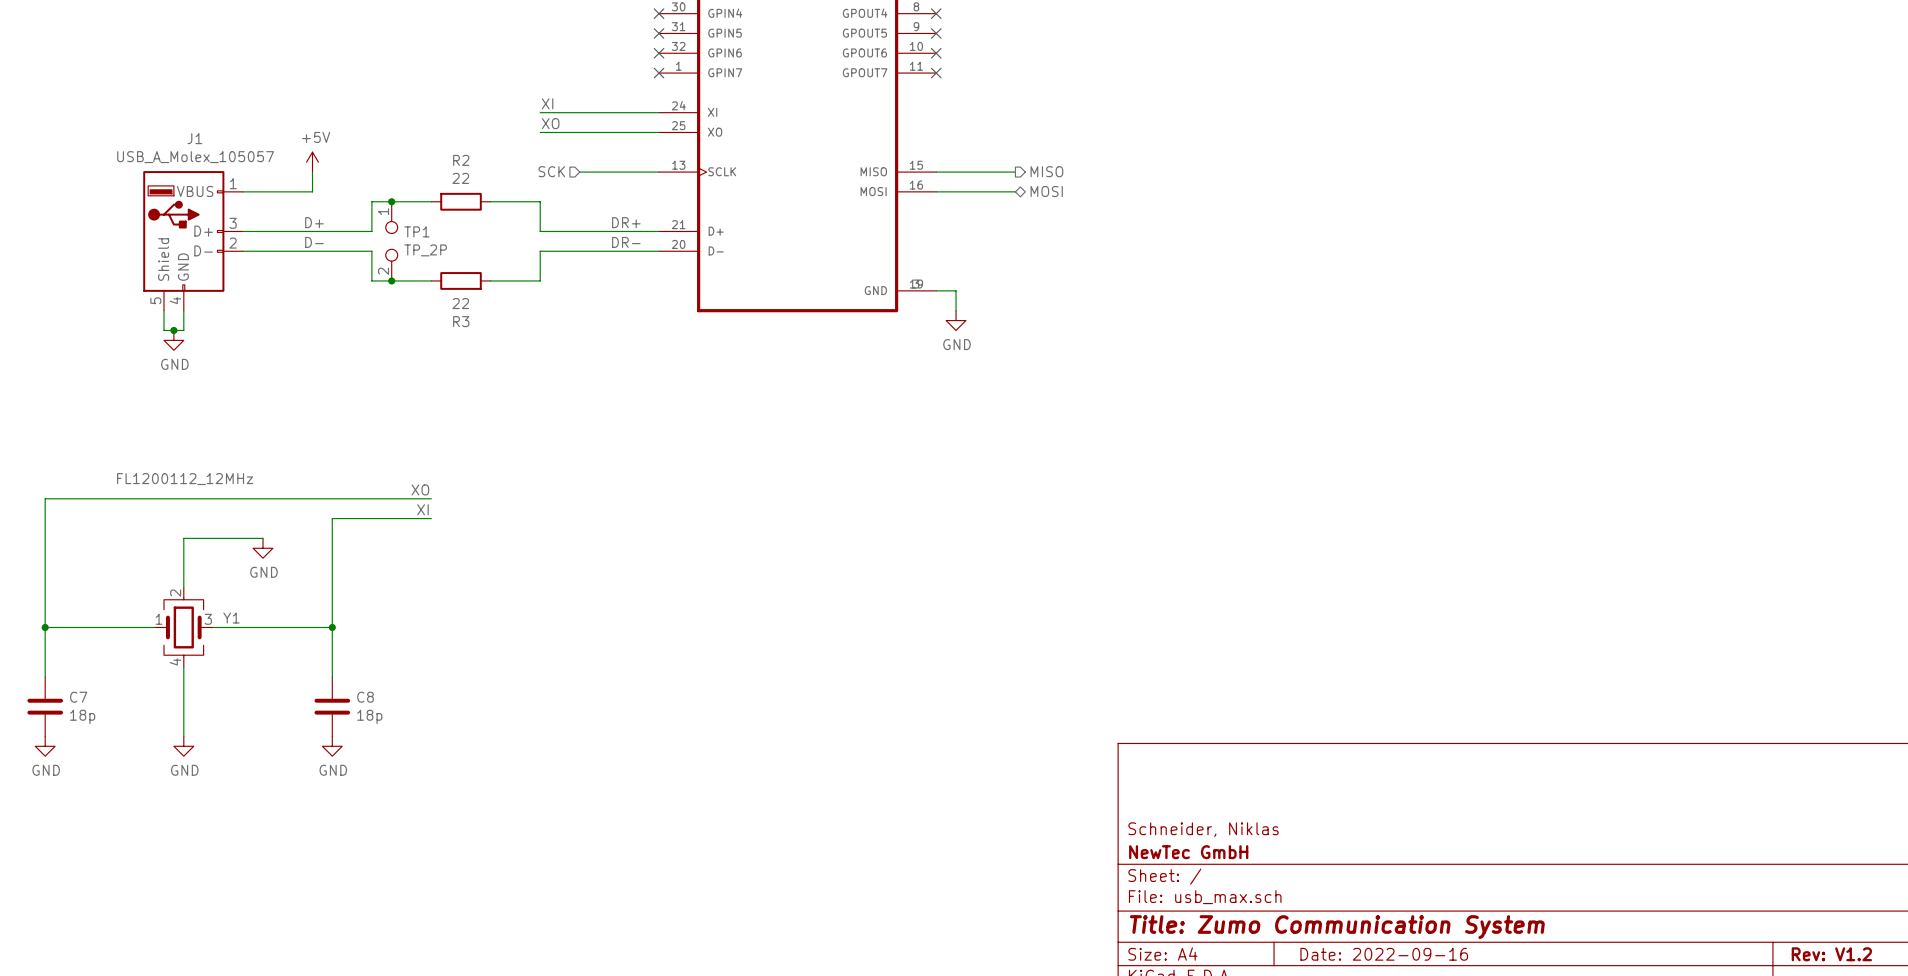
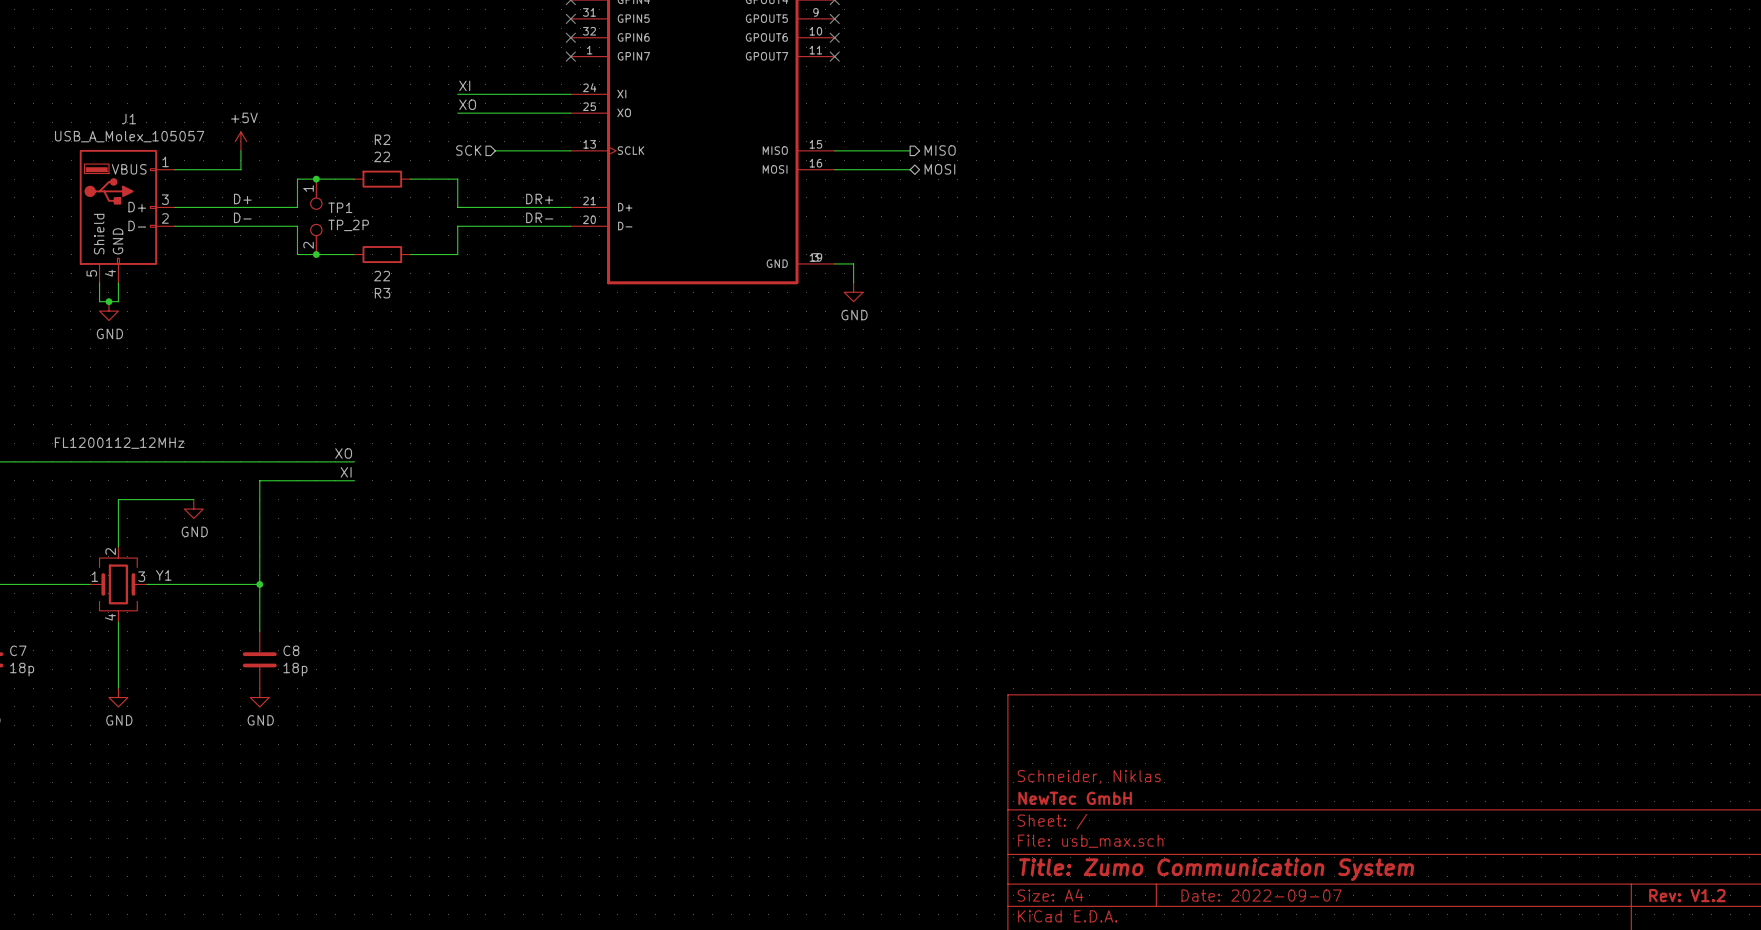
title block: Date: 2022-09-16 (1384, 954) -> Date: 2022-09-07 (1261, 895)

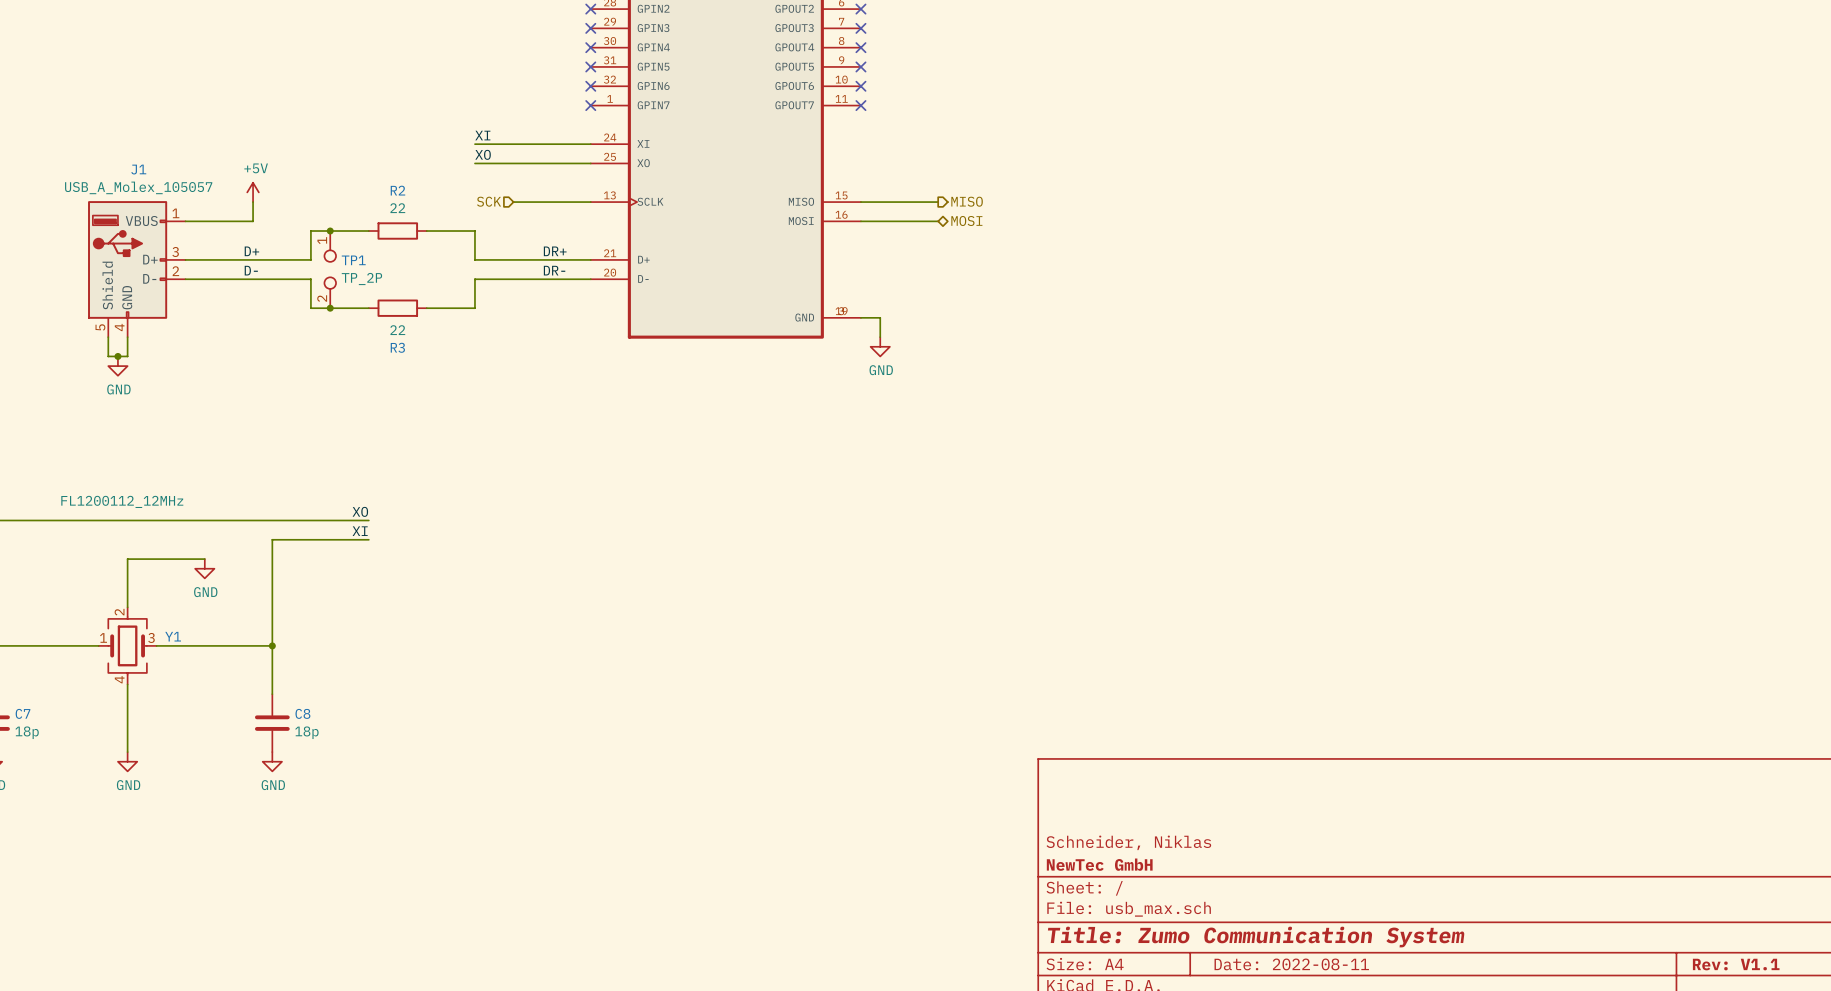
title block: Date: 2022-09-07 (1261, 895) -> Date: 2022-08-11 (1291, 964)
title block: Rev: V1.2 (1687, 895) -> Rev: V1.1 (1736, 964)

